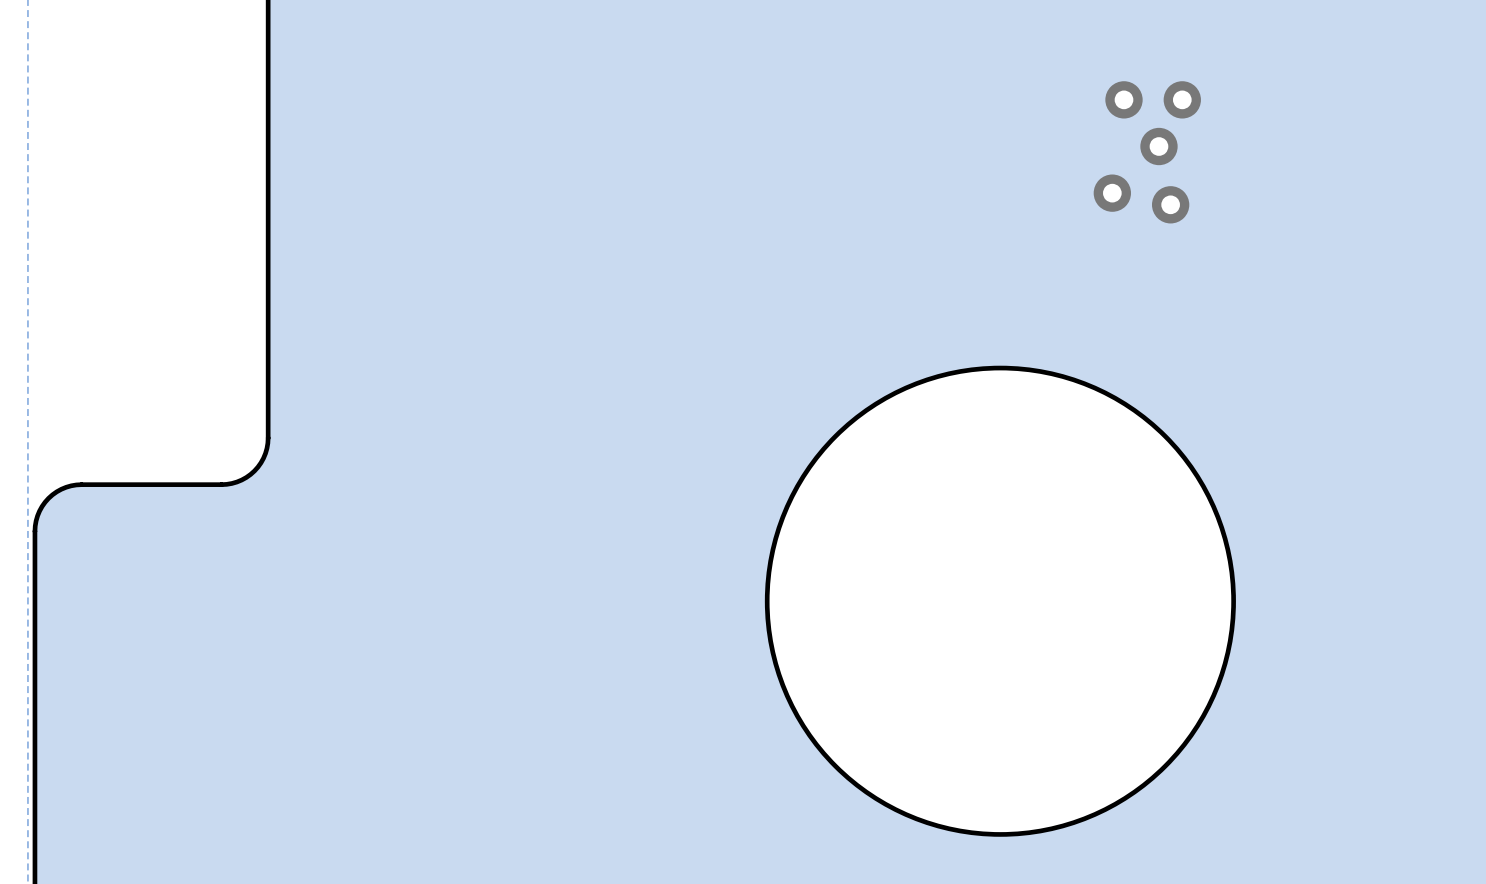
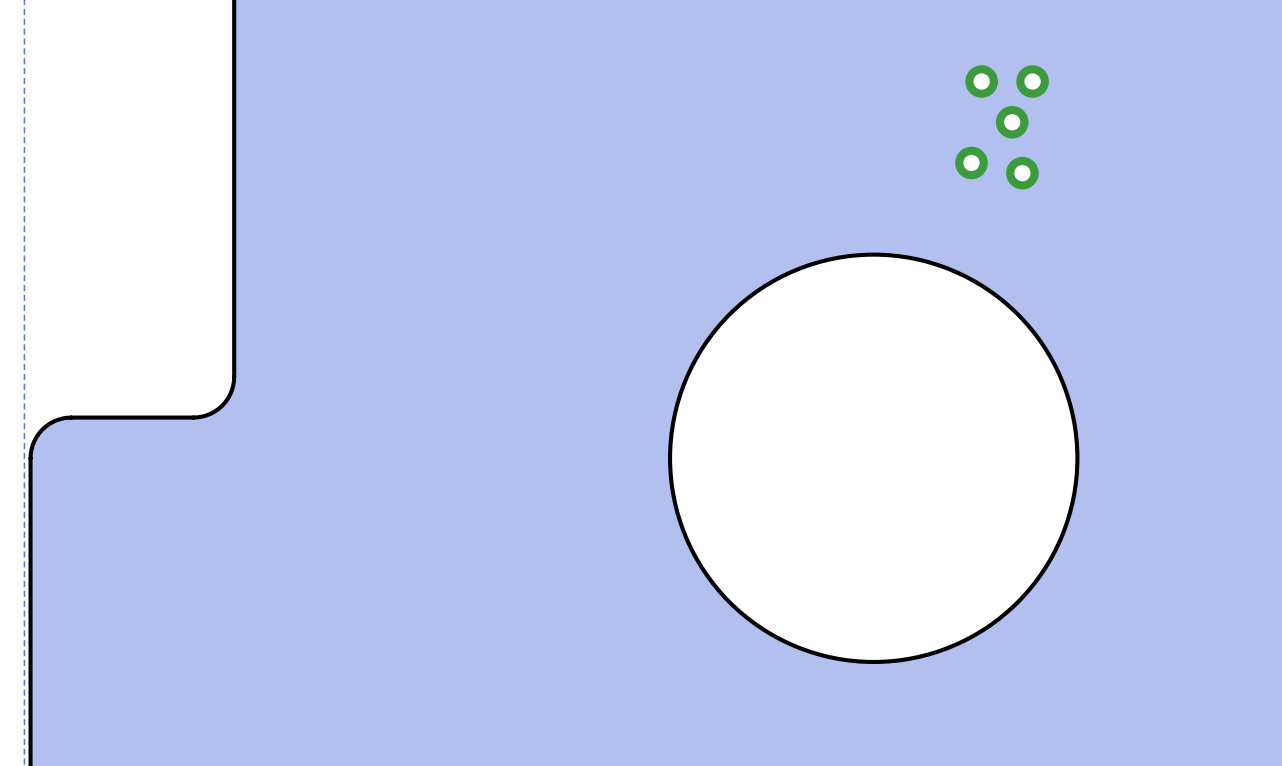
round board edge position: (1000, 601) -> (873, 458)

